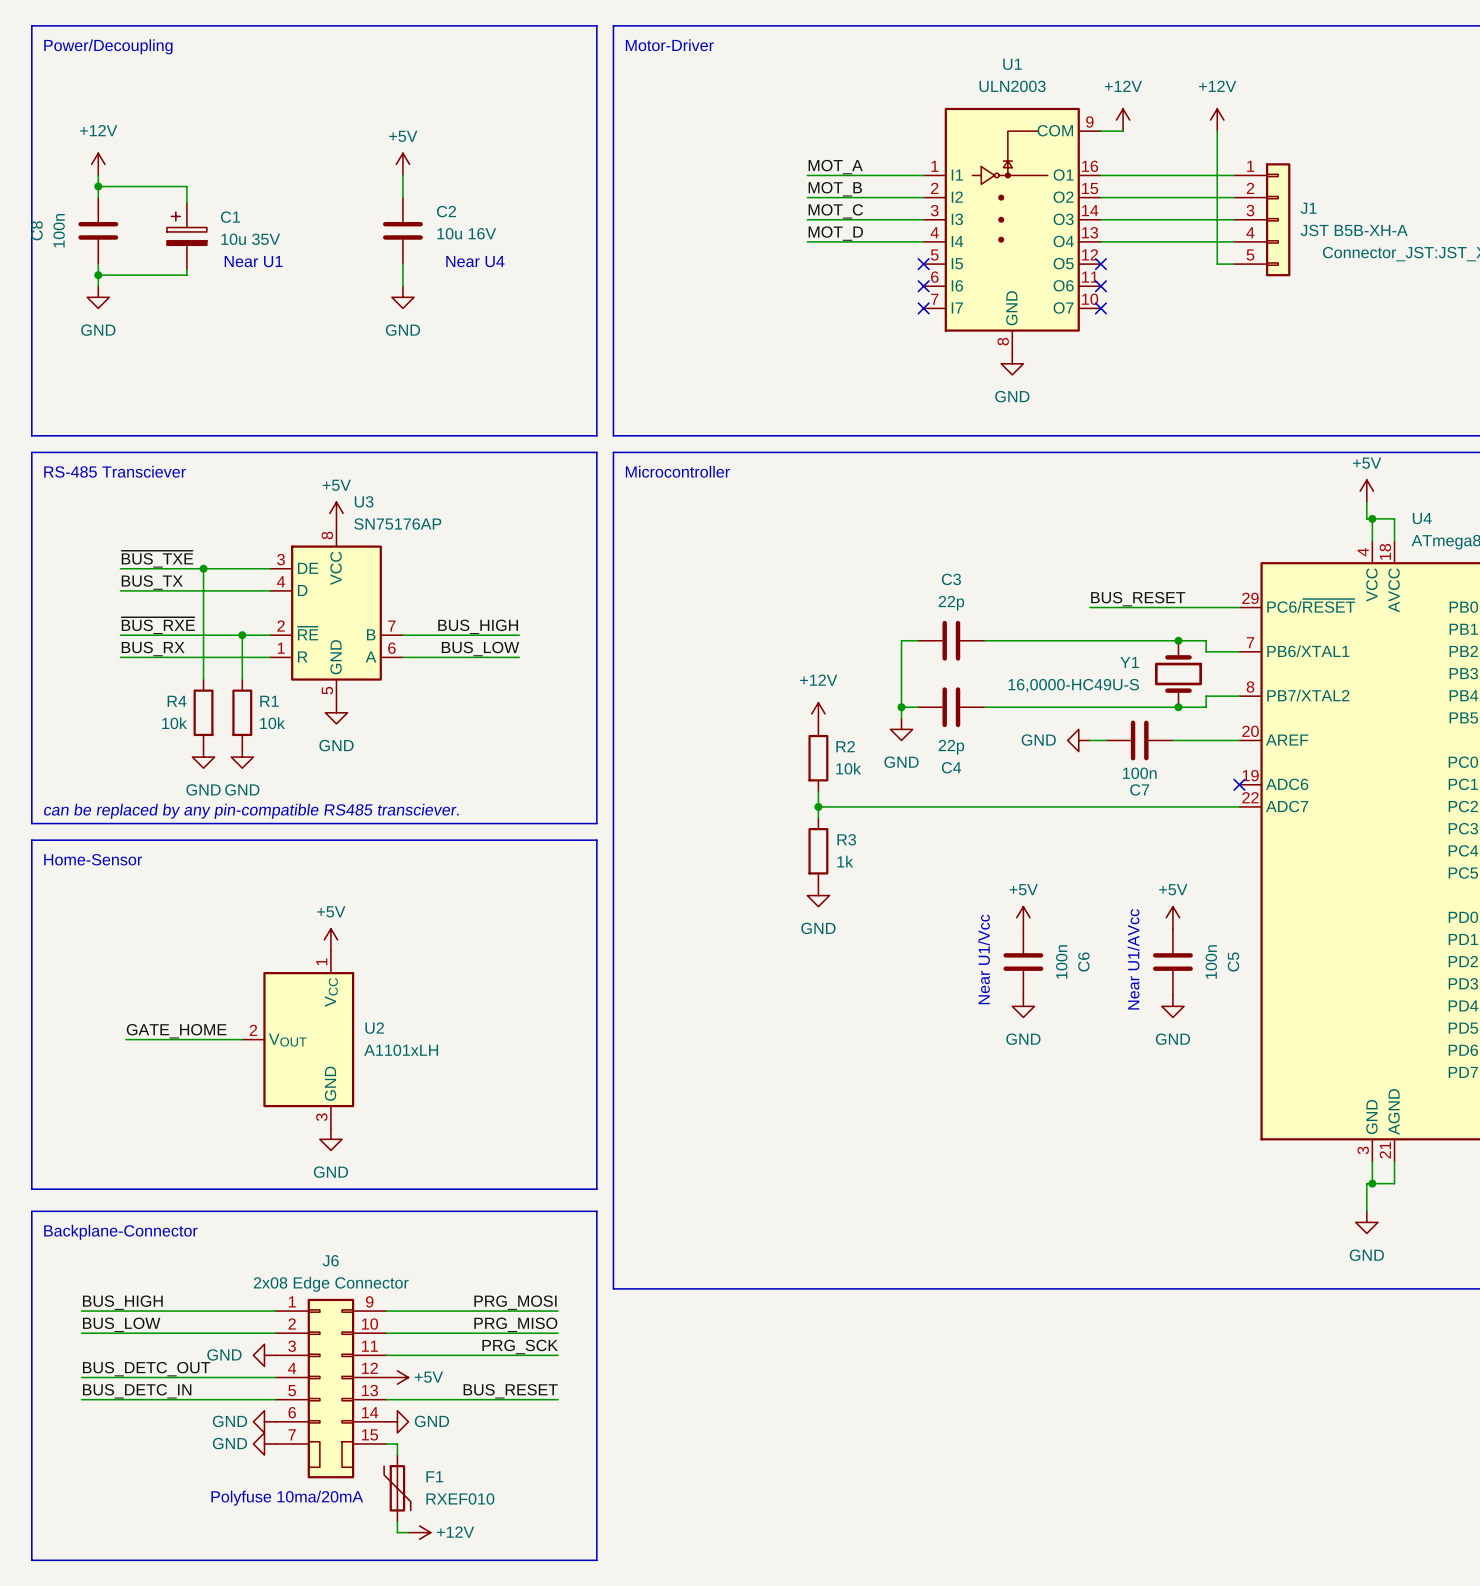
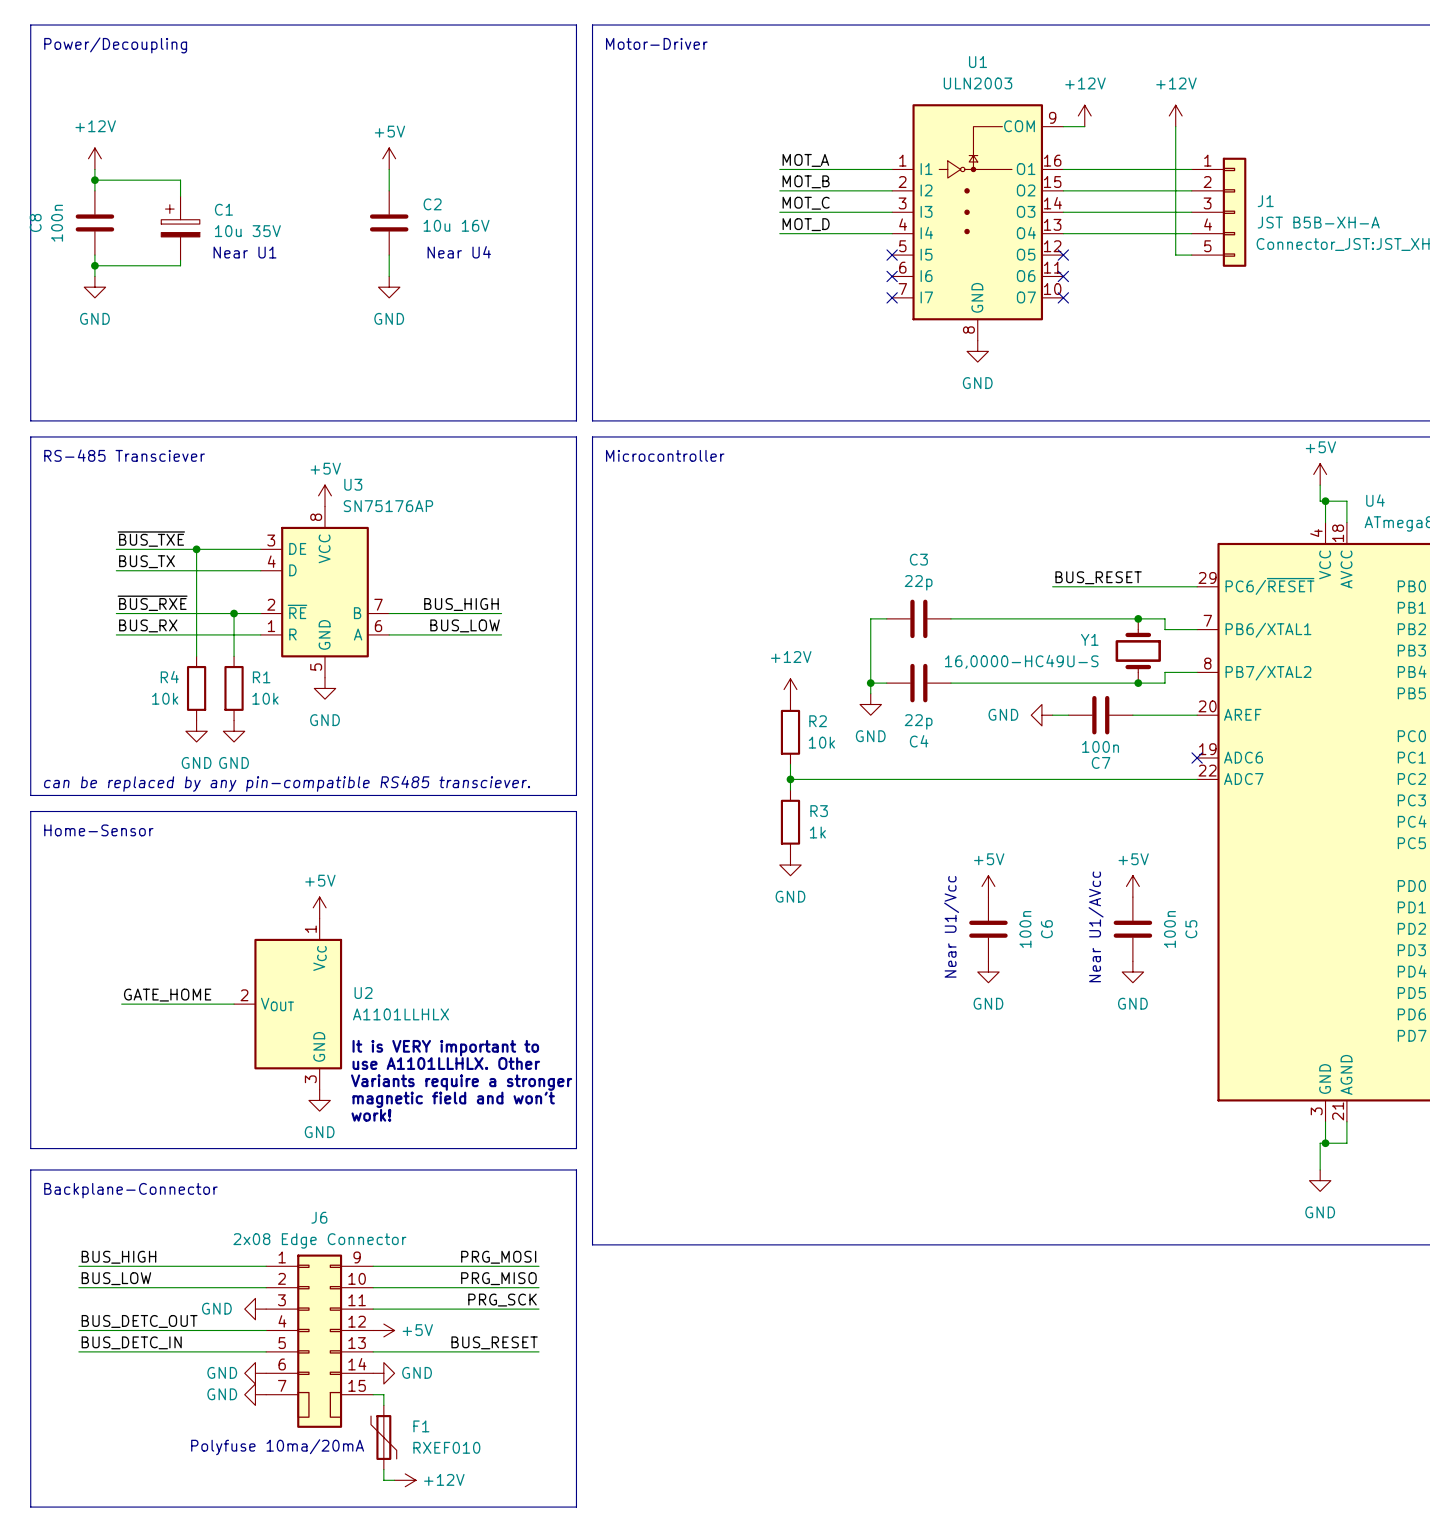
U2 value: A1101xLH (401, 1050) -> A1101LLHLX (401, 1014)
text: none -> It is VERY important to (445, 1048)
text: none -> use A1101LLHLX. Other (446, 1063)
text: none -> Variants require a stronger (461, 1082)
text: none -> magnetic field and won't (453, 1099)
text: none -> work! (371, 1115)

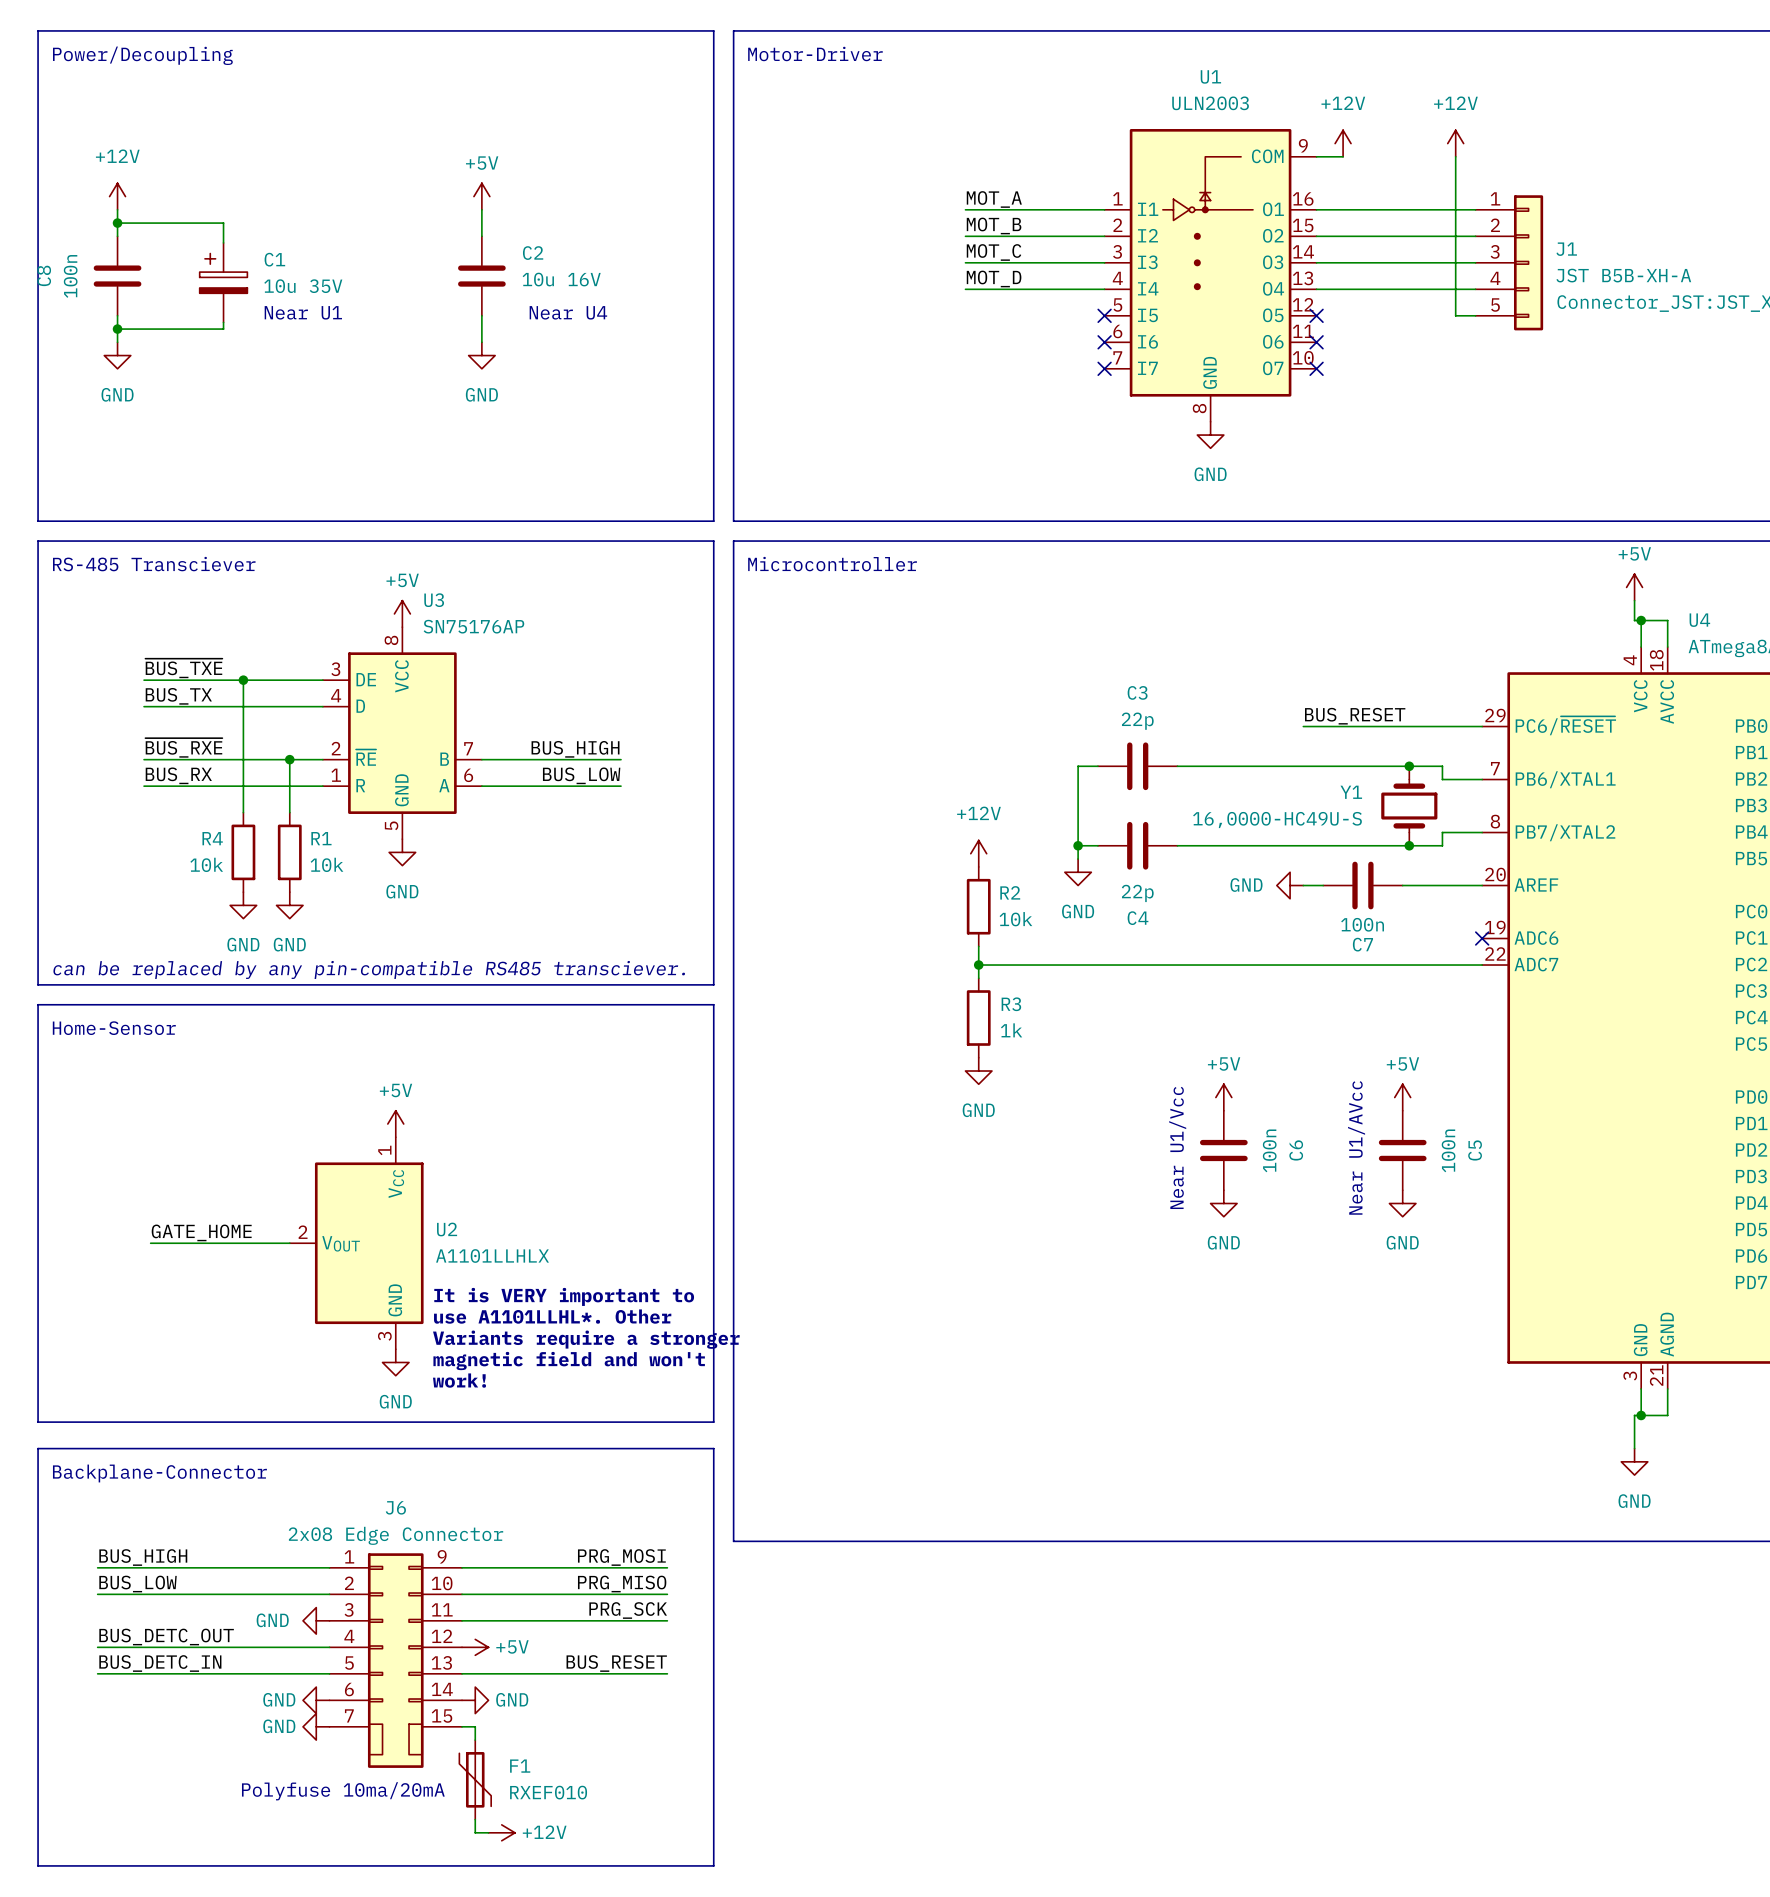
text: use A1101LLHLX. Other (446, 1063) -> use A1101LLHL*. Other (552, 1316)

